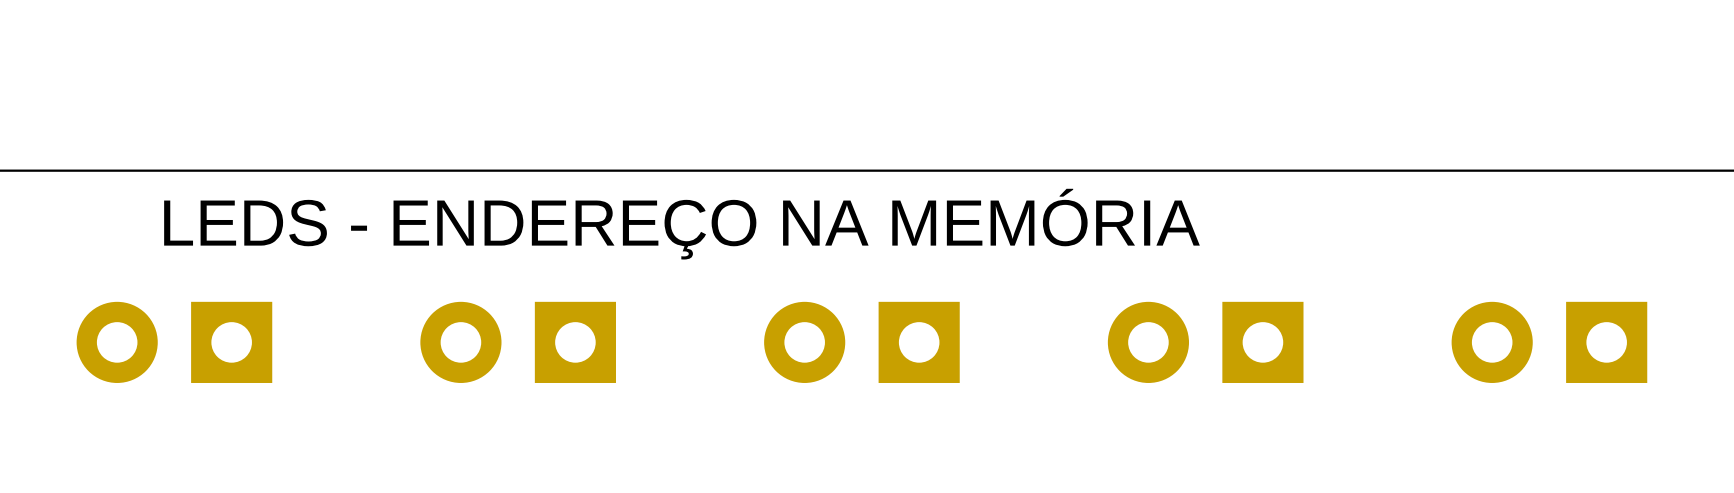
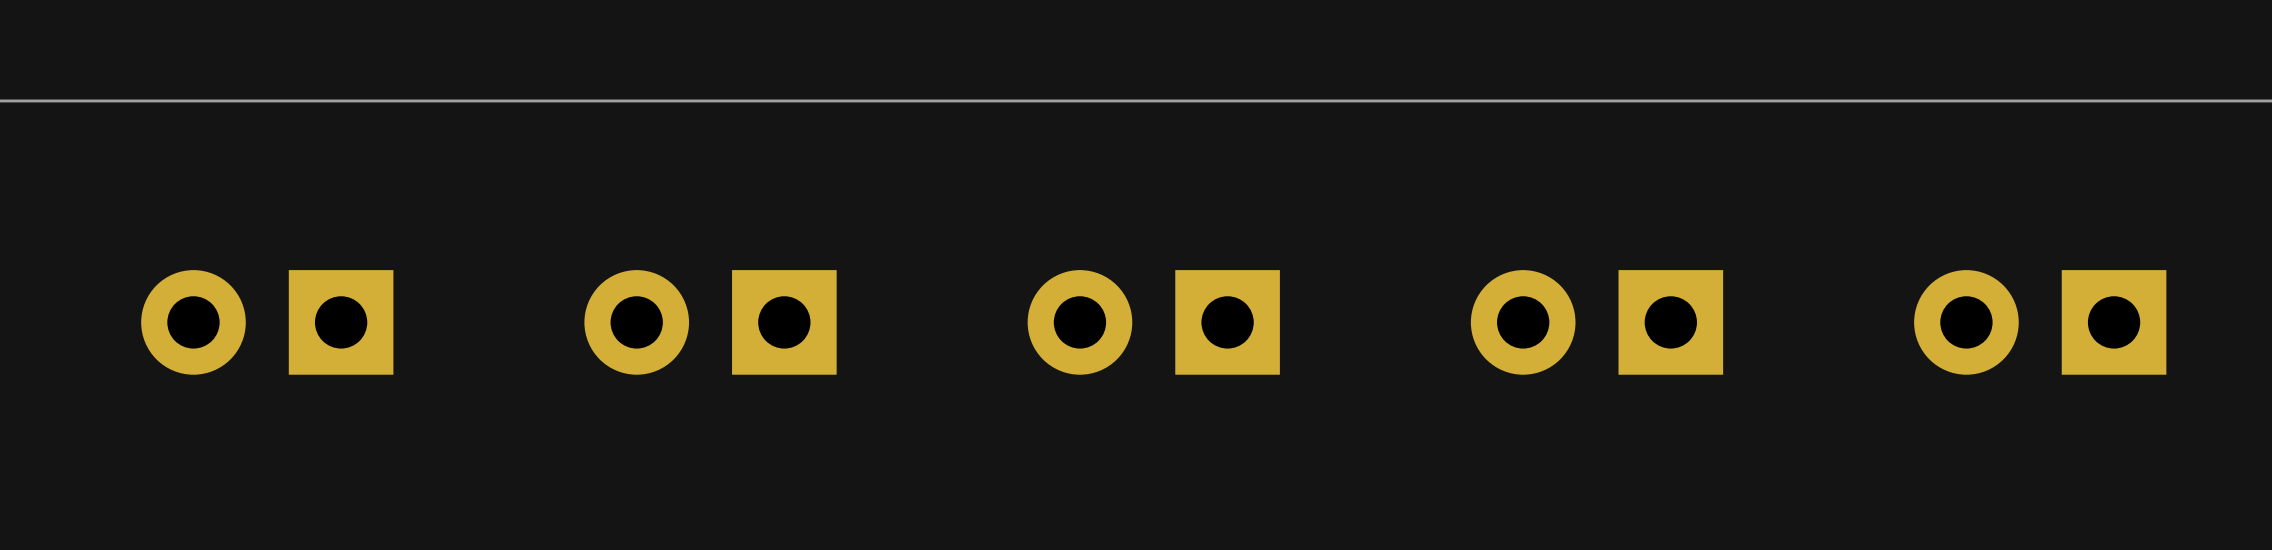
text: LEDS - ENDEREÇO NA MEMÓRIA (681, 224) -> none

